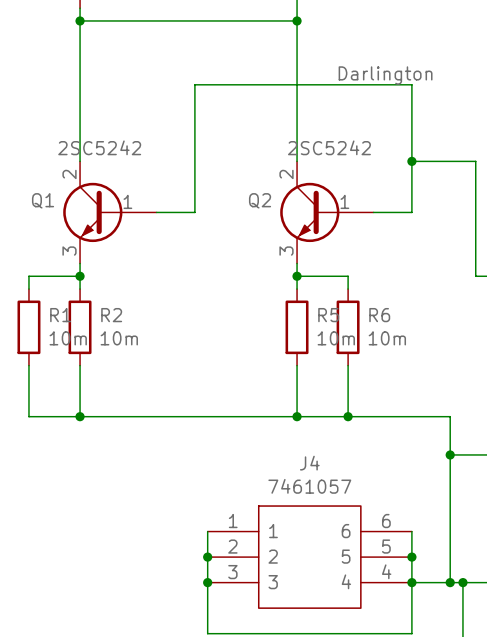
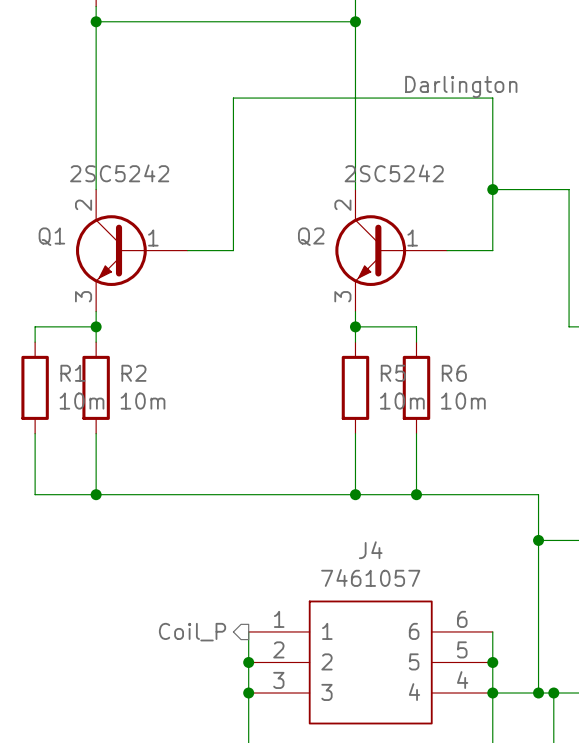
hierarchical label: none -> Coil_P (192, 632)

